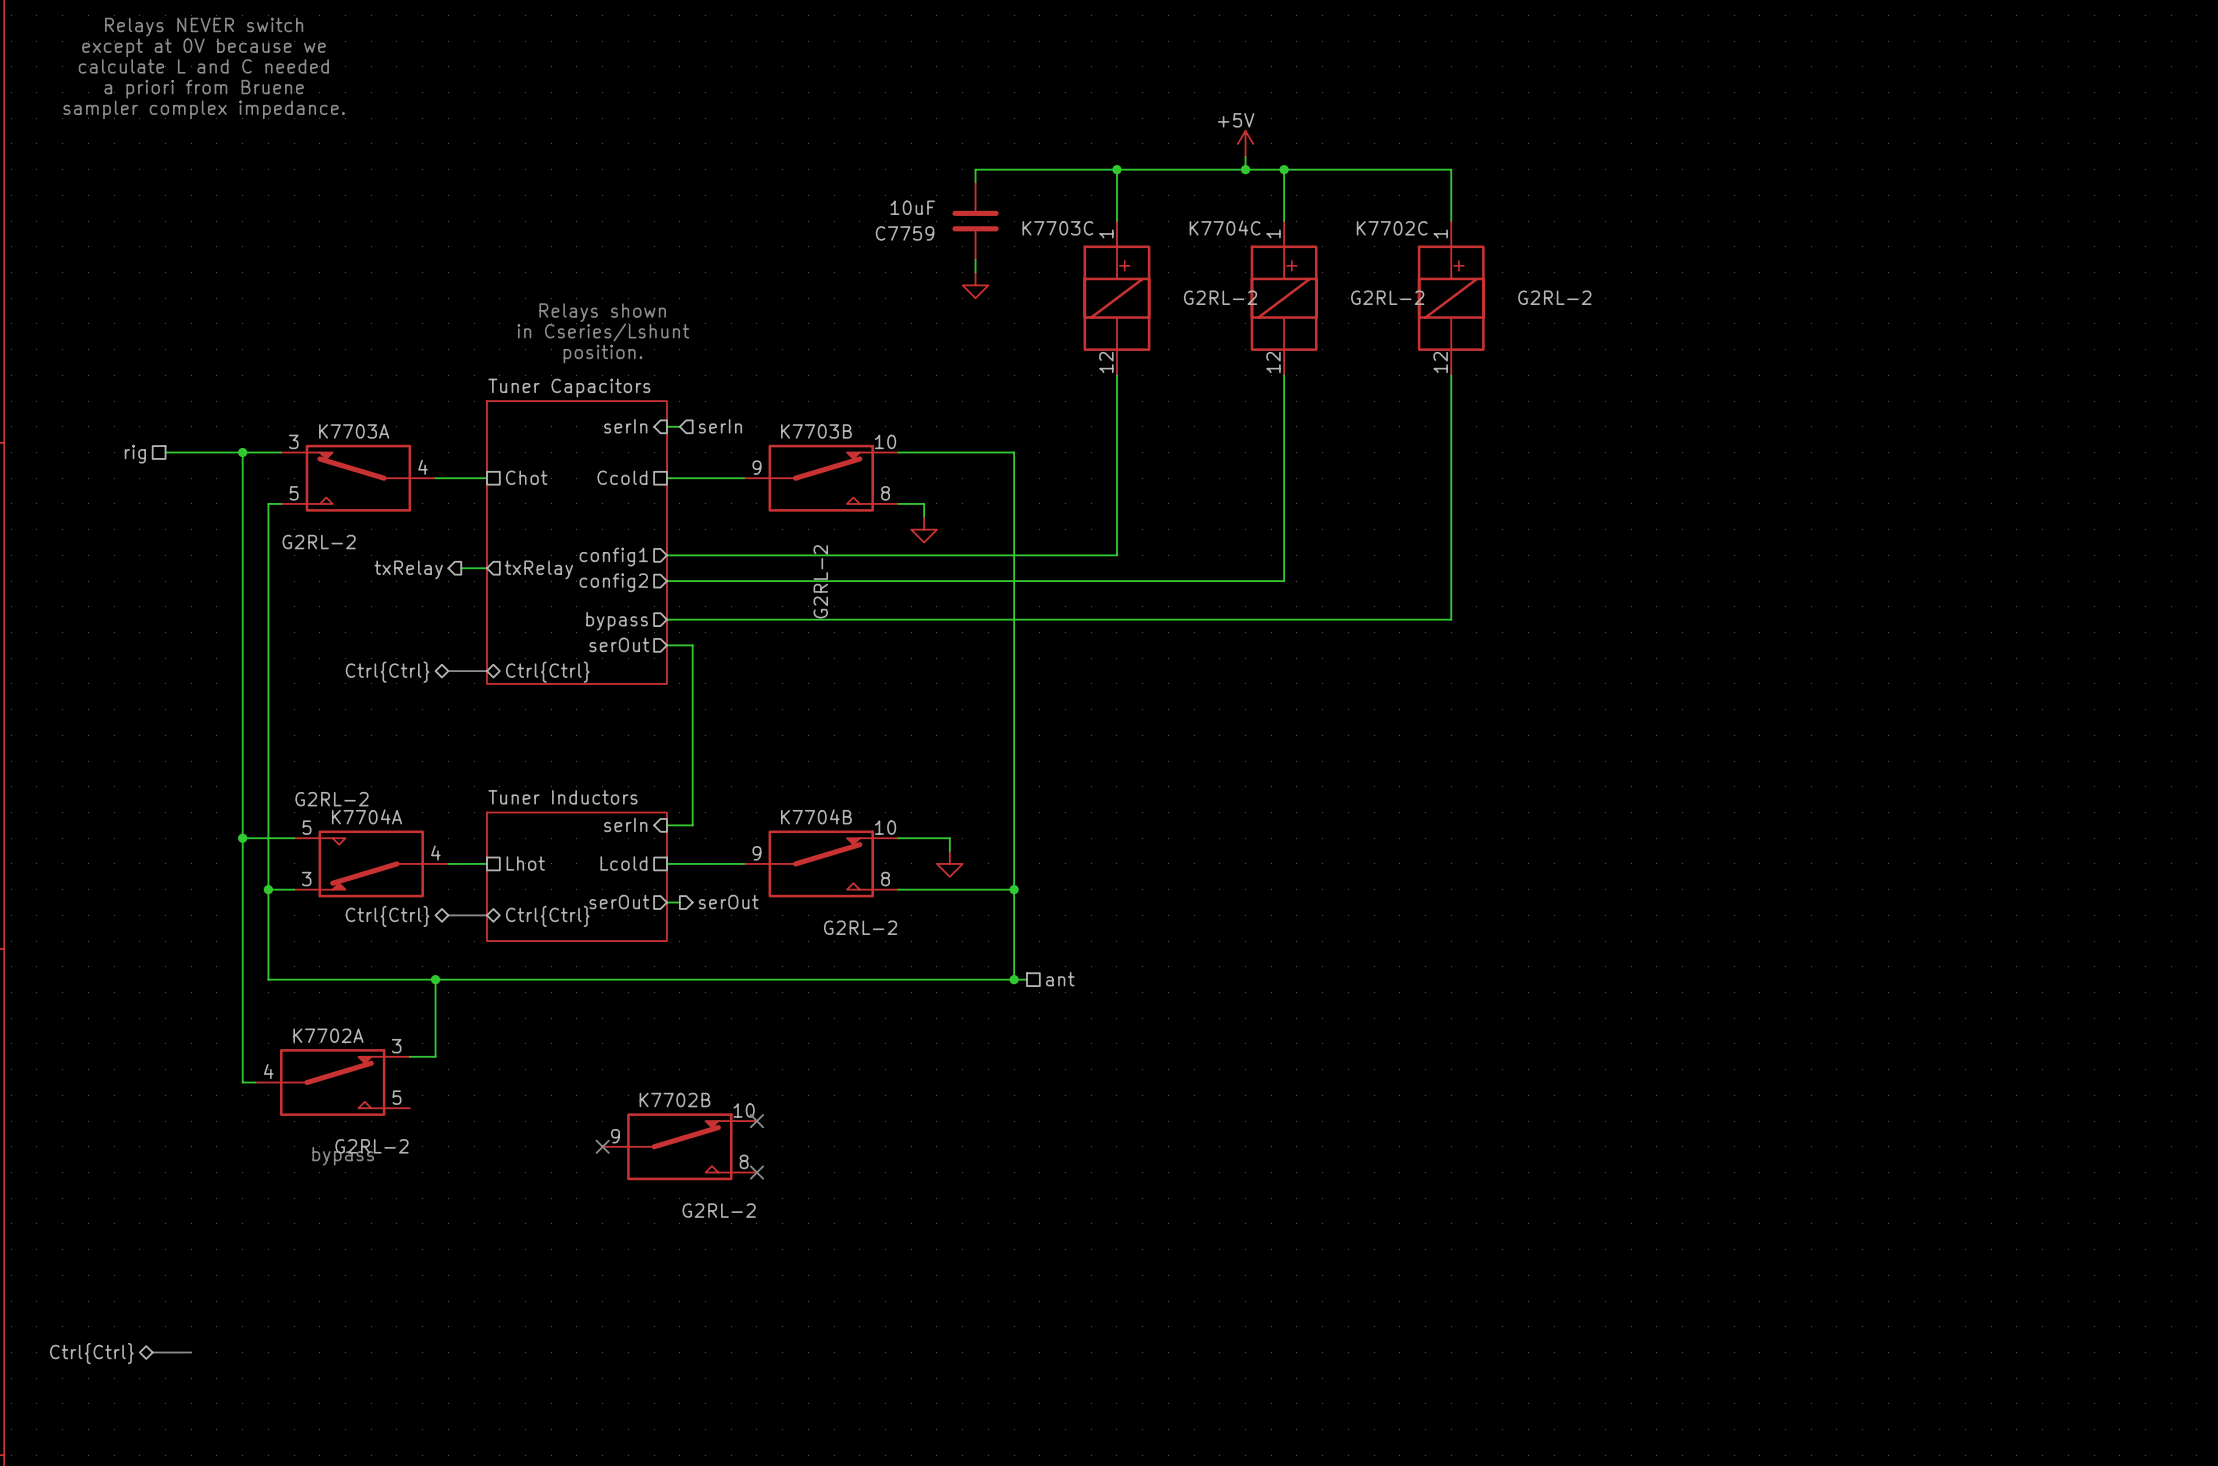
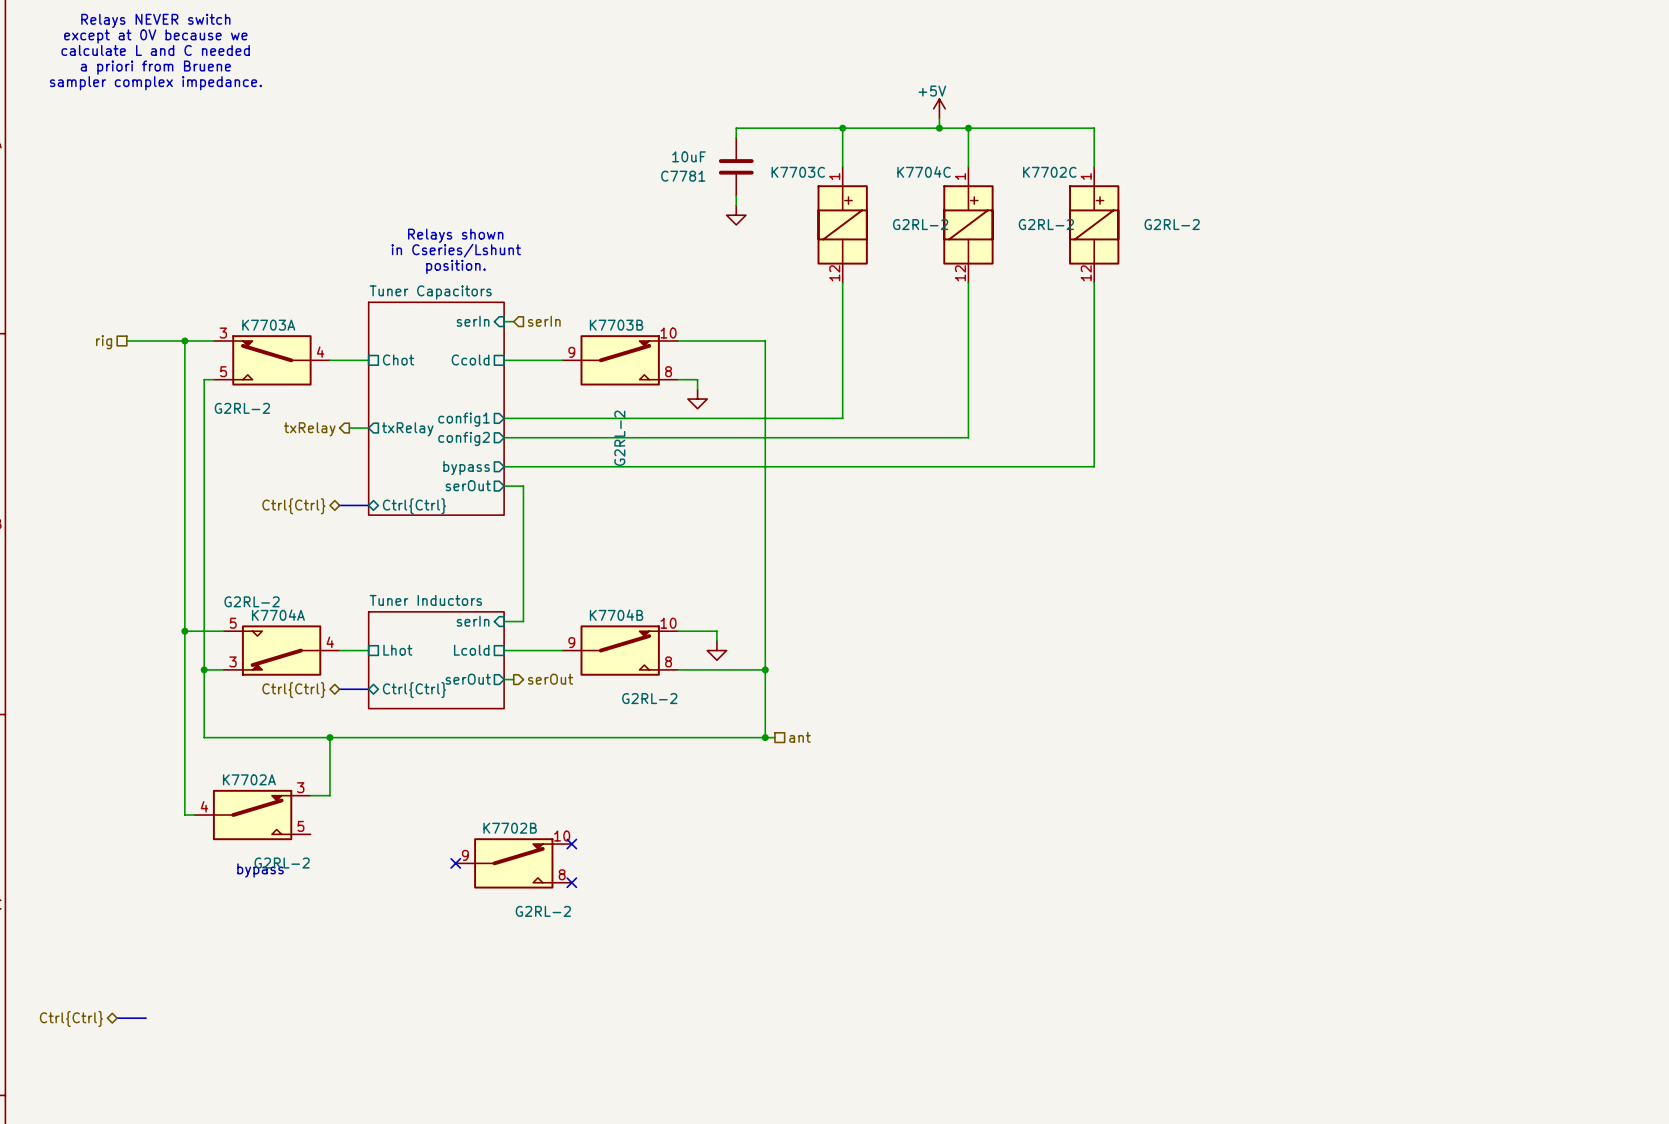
C7759 name: C7759 (905, 233) -> C7781 (683, 176)

